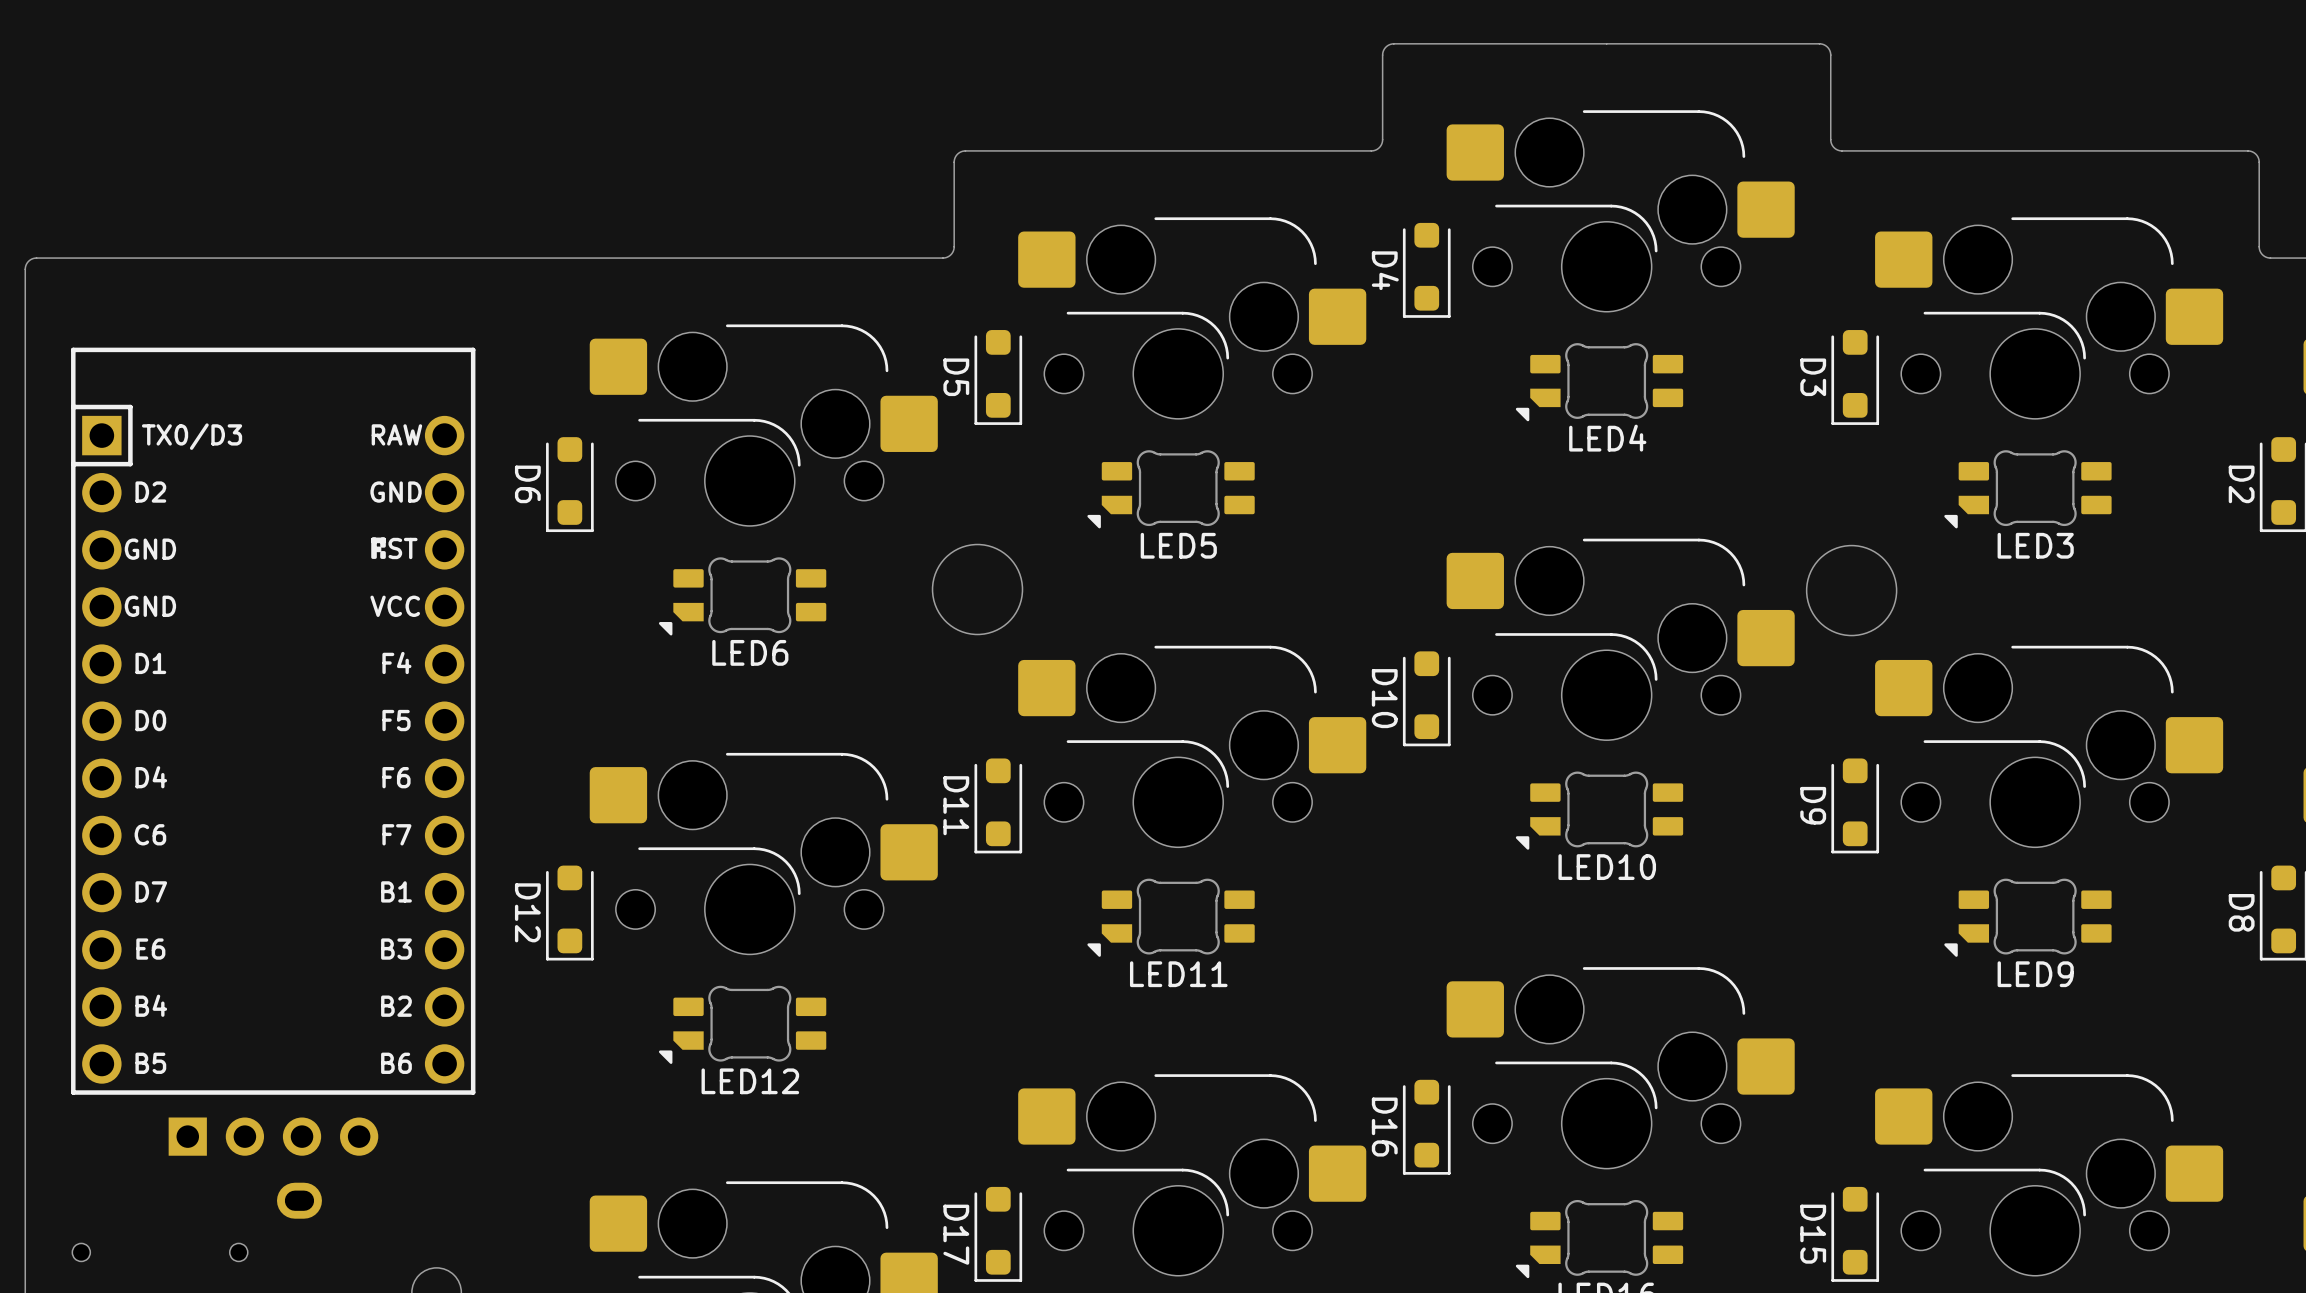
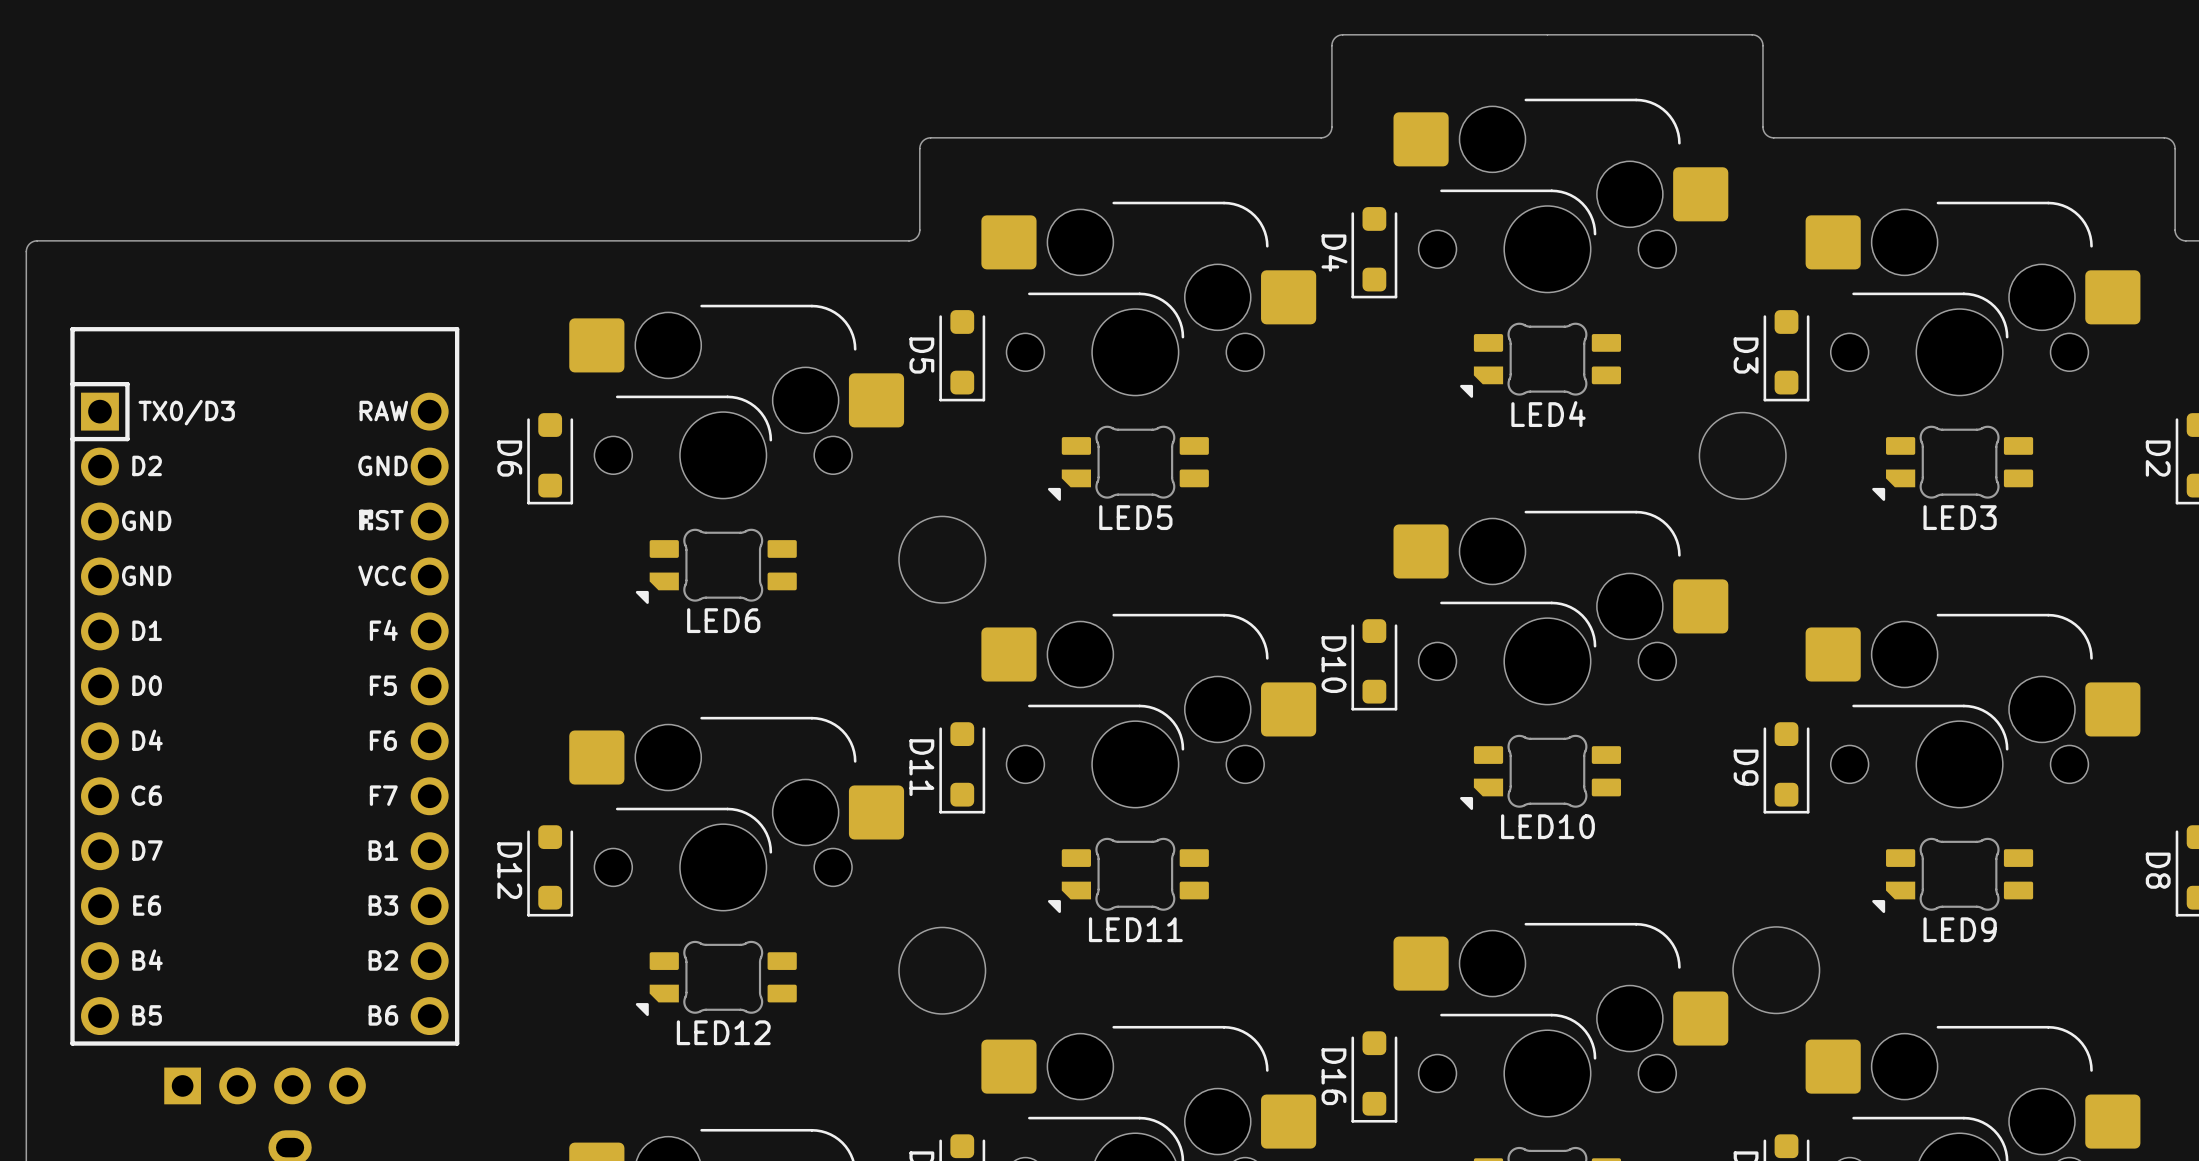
round board edge position: (1851, 590) -> (1742, 455)
round board edge: none -> [1732, 926, 1821, 1015]
round board edge: none -> [898, 926, 987, 1015]

